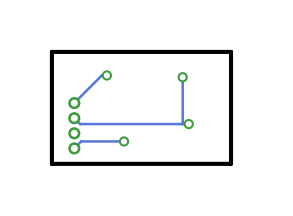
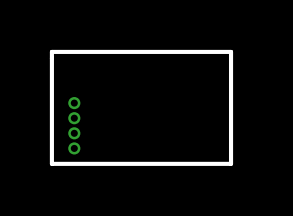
track: (106, 75) (101, 75) (74, 103) -> none
via: (106, 75) -> none
track: (182, 77) (182, 124) -> none
via: (182, 77) -> none
track: (74, 118) (80, 124) (188, 124) -> none
via: (188, 124) -> none
track: (124, 141) (81, 141) (74, 148) -> none
via: (124, 141) -> none

